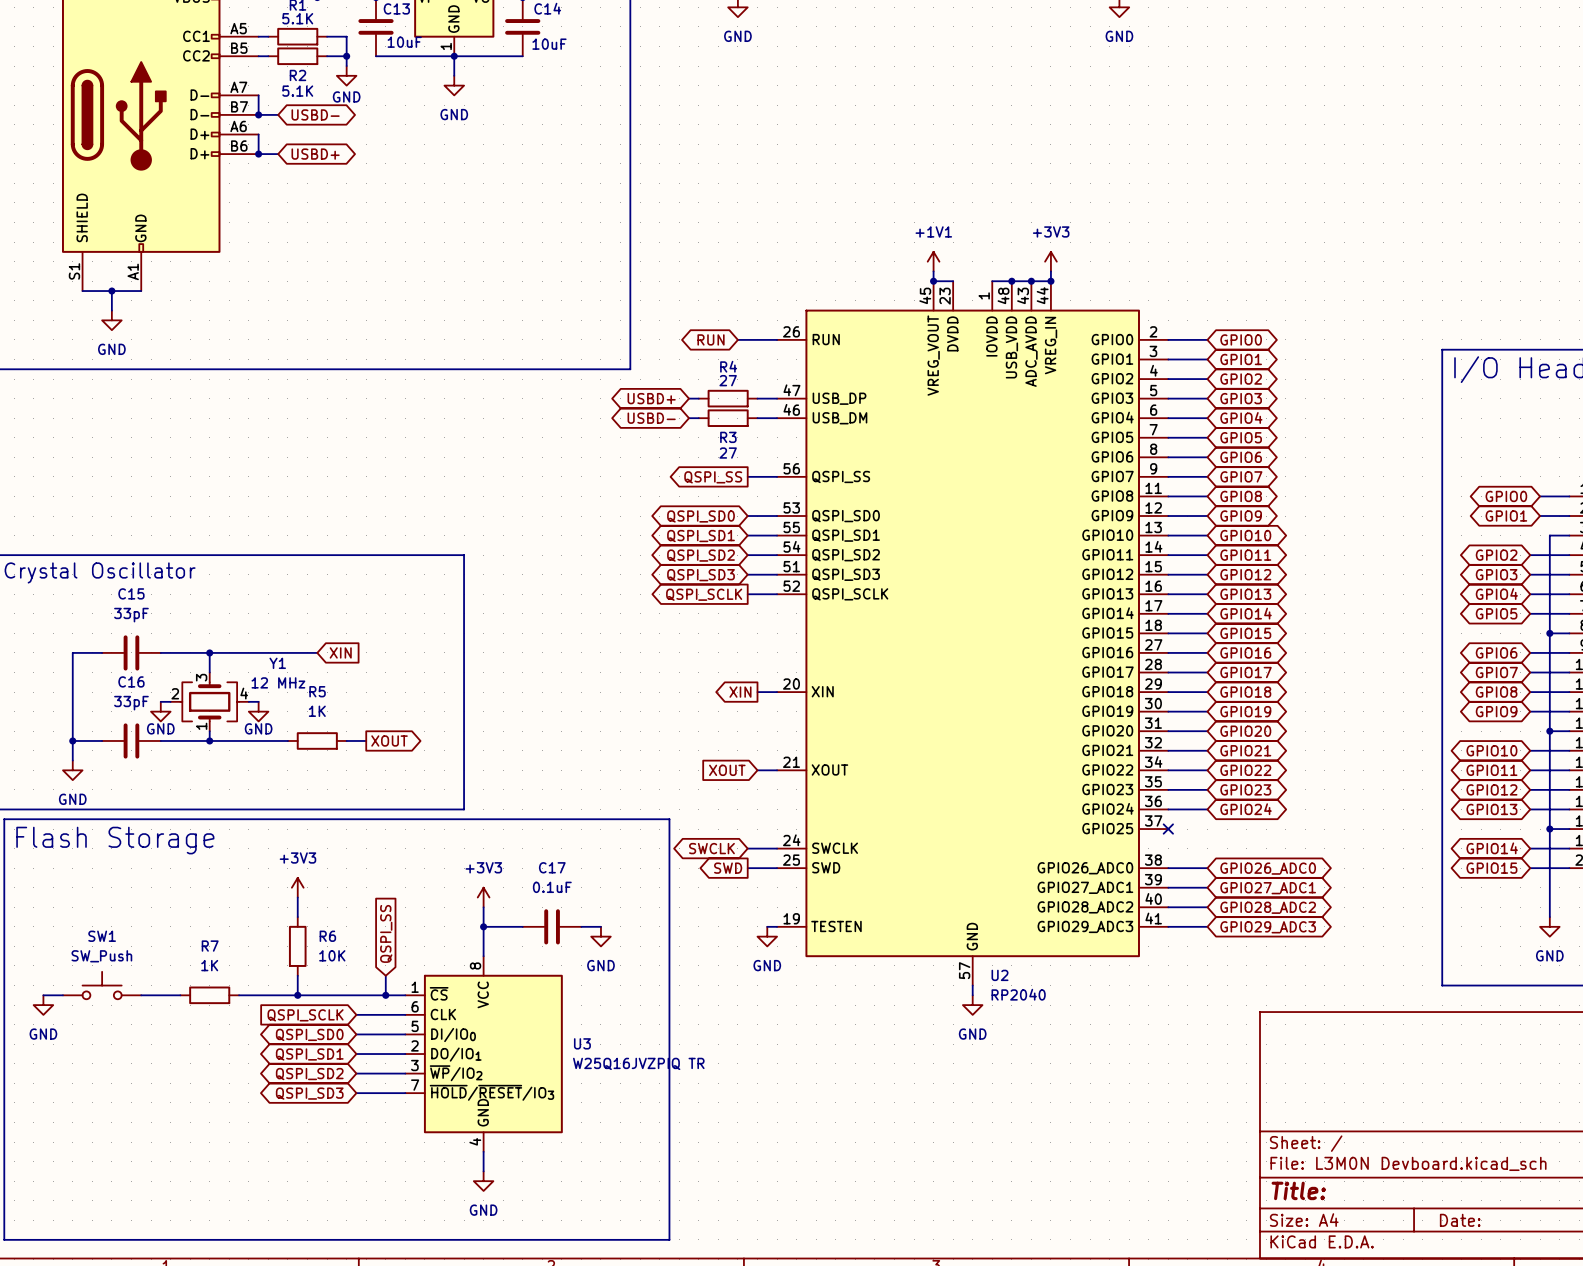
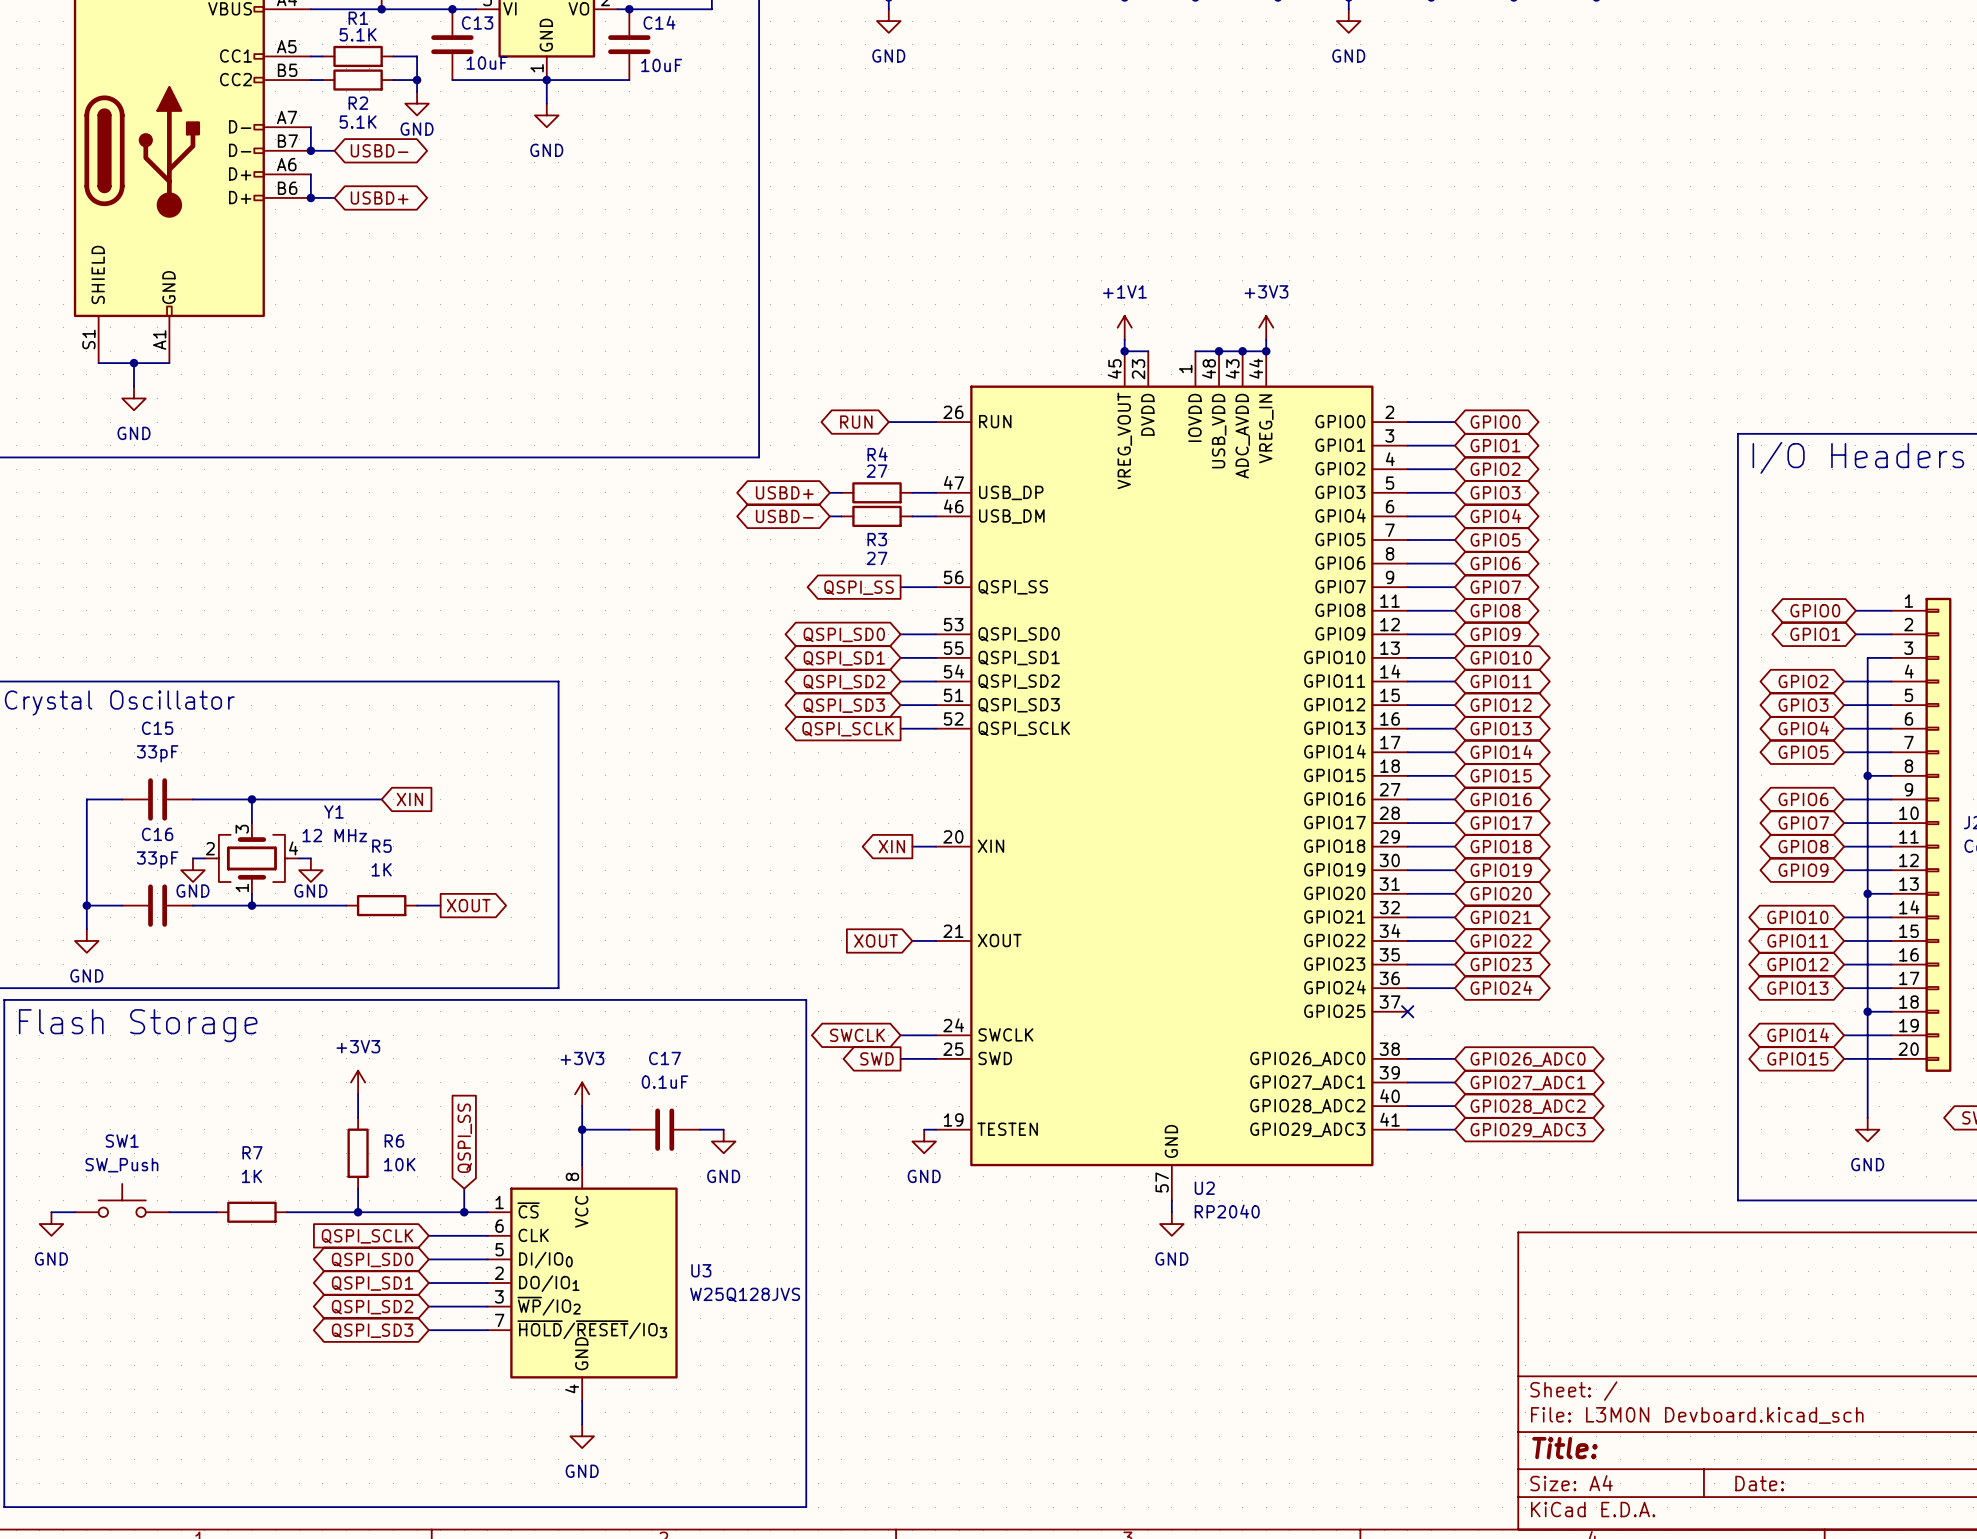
U3 value: W25Q16JVZPIQ TR (638, 1063) -> W25Q128JVS (745, 1294)

